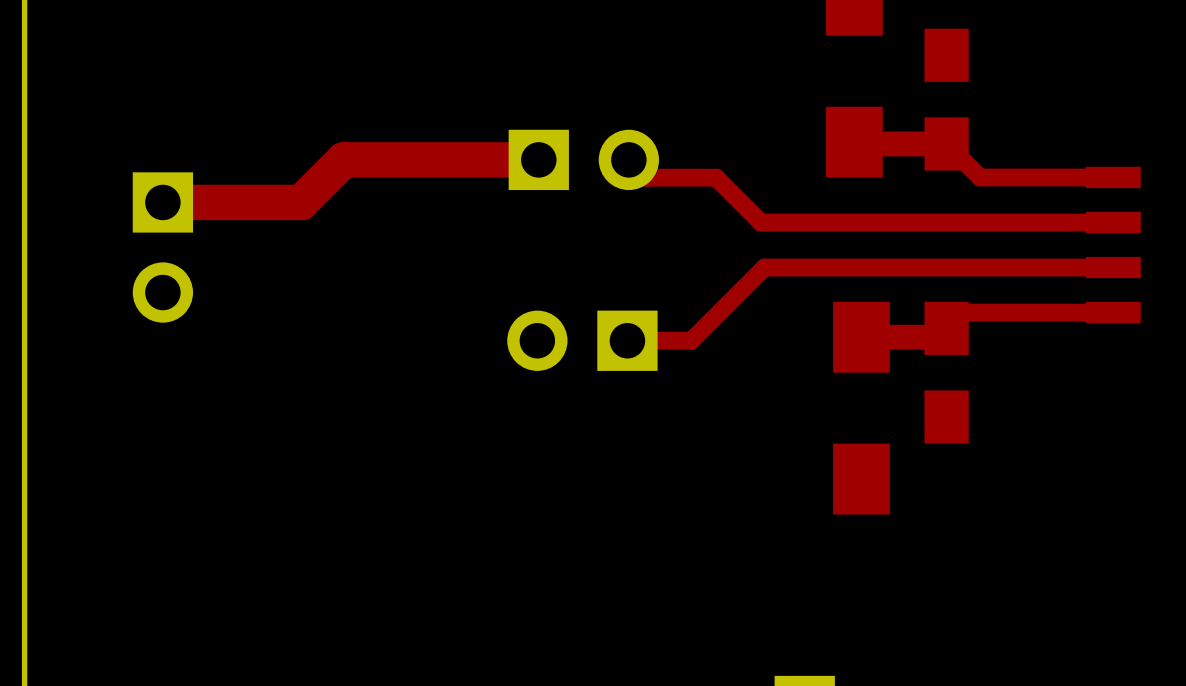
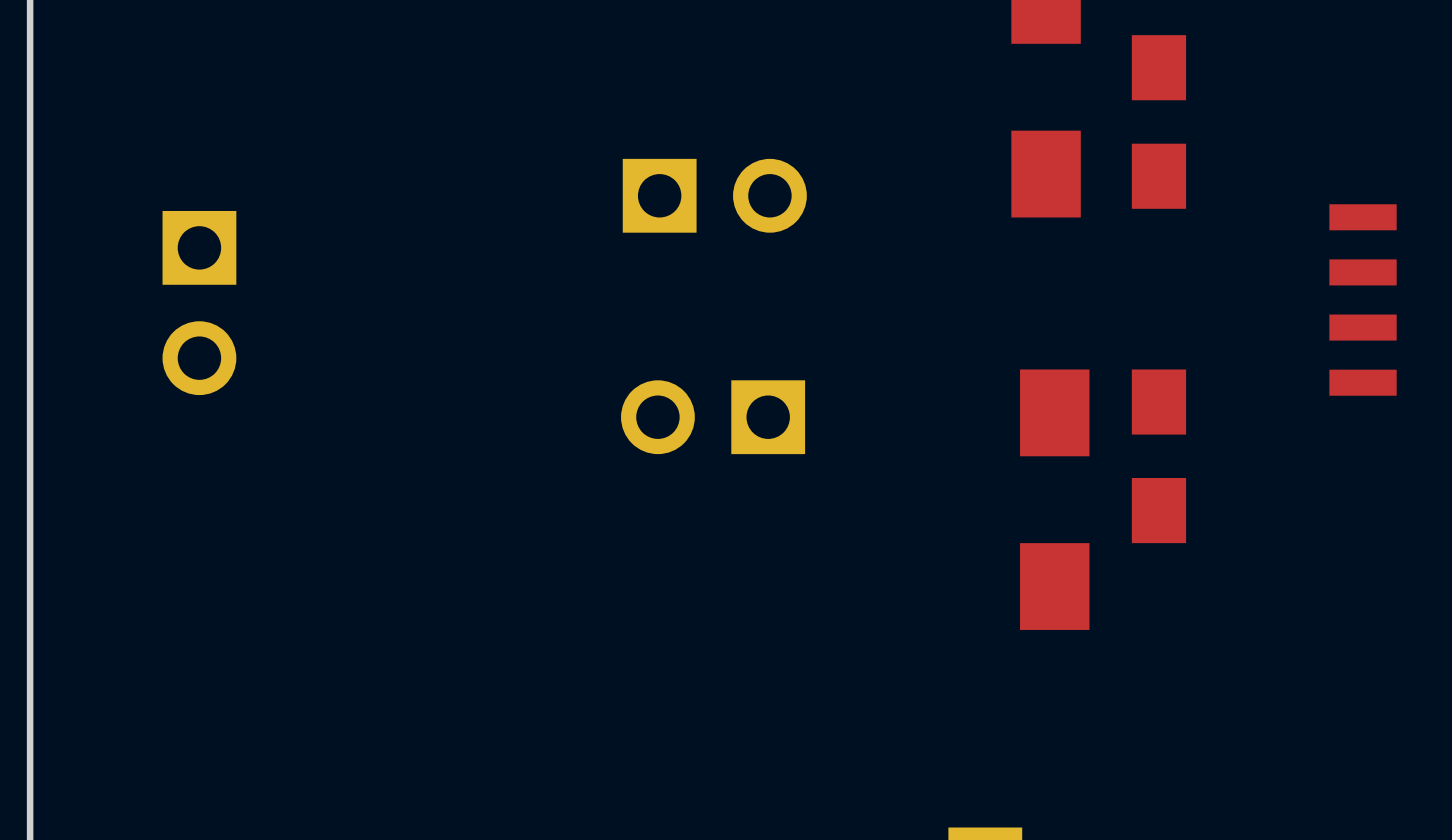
top track: (854, 142) (856, 143) (946, 143) (980, 177) (1113, 177) -> none
top track: (538, 159) (343, 159) (301, 202) (162, 202) -> none
top track: (628, 159) (646, 177) (716, 177) (760, 222) (1113, 222) -> none
top track: (1113, 267) (764, 267) (691, 340) (627, 340) -> none
top track: (1113, 312) (962, 312) (937, 337) (861, 337) -> none

